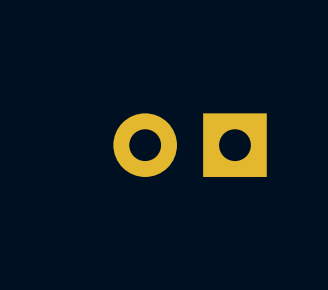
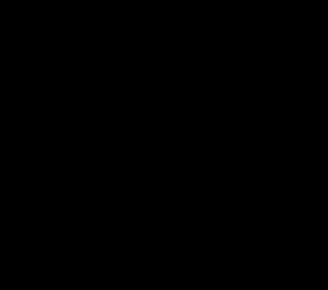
part: (190, 145) -> none

